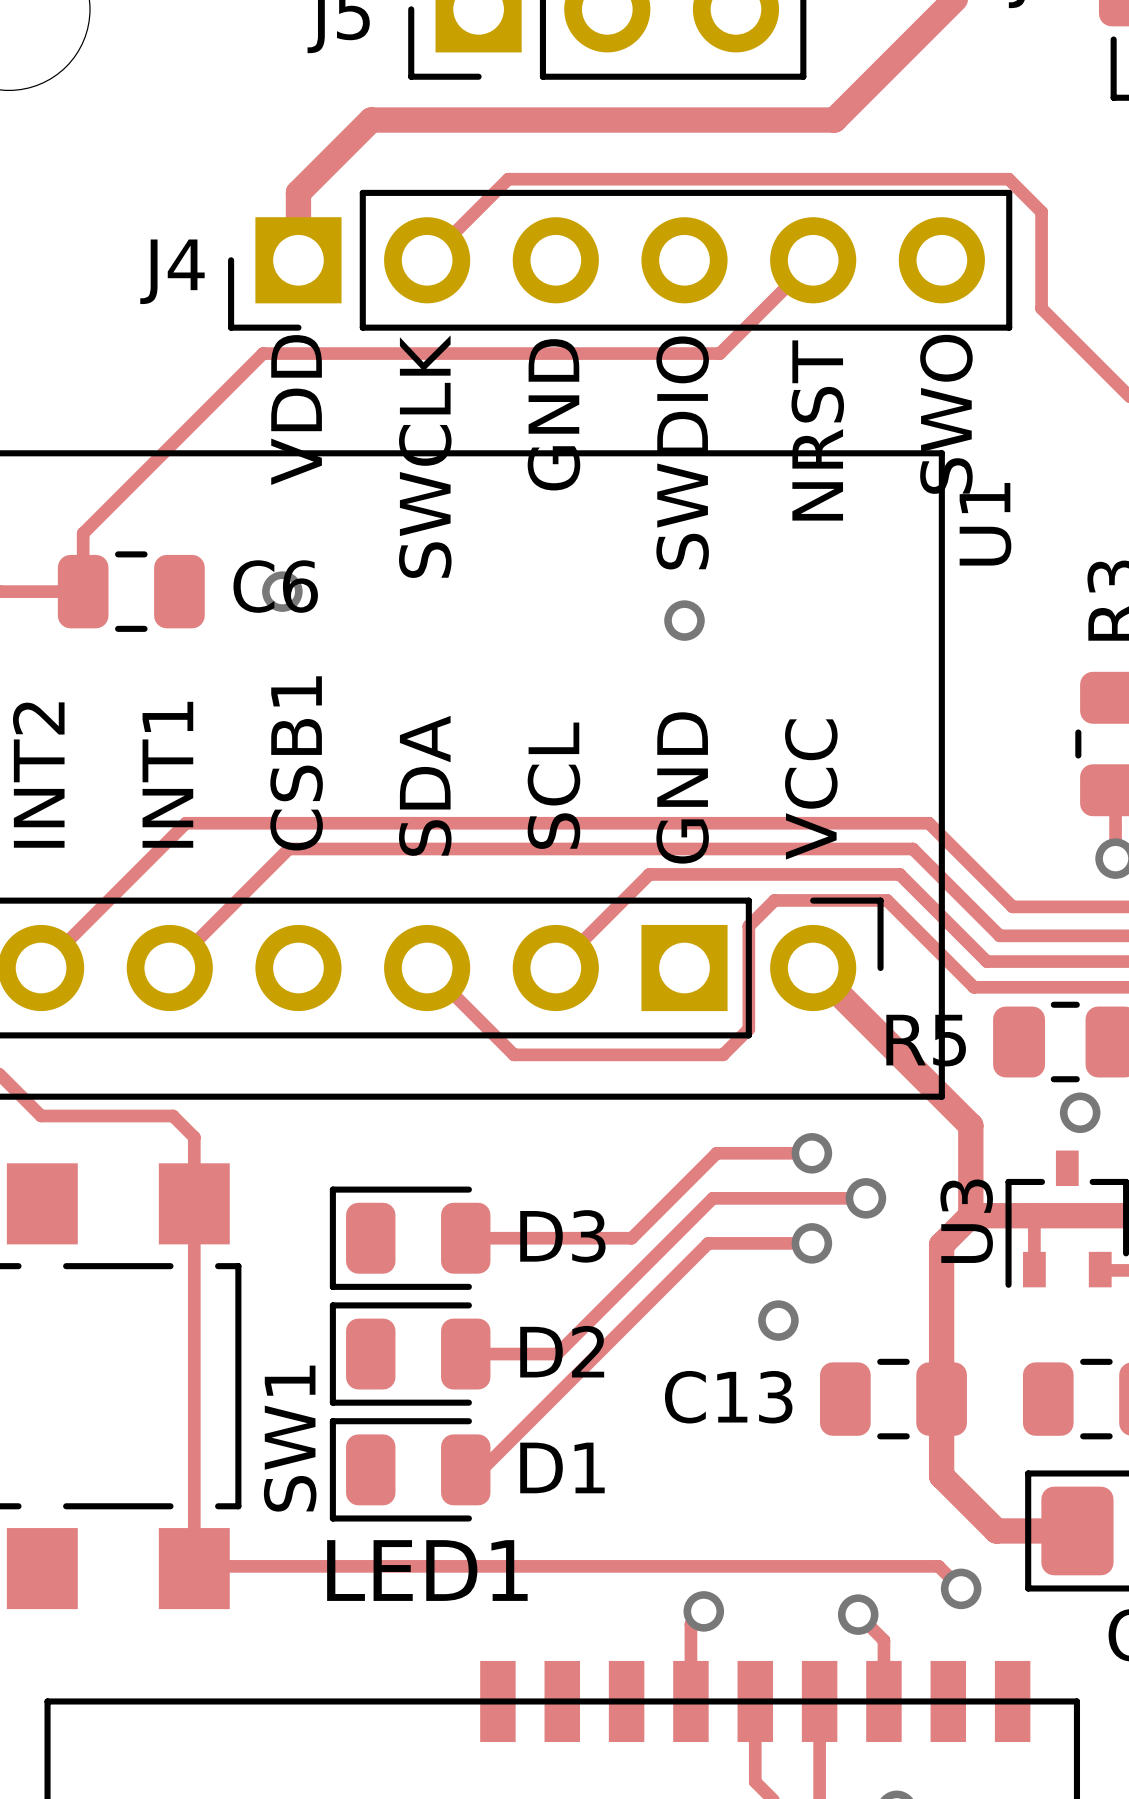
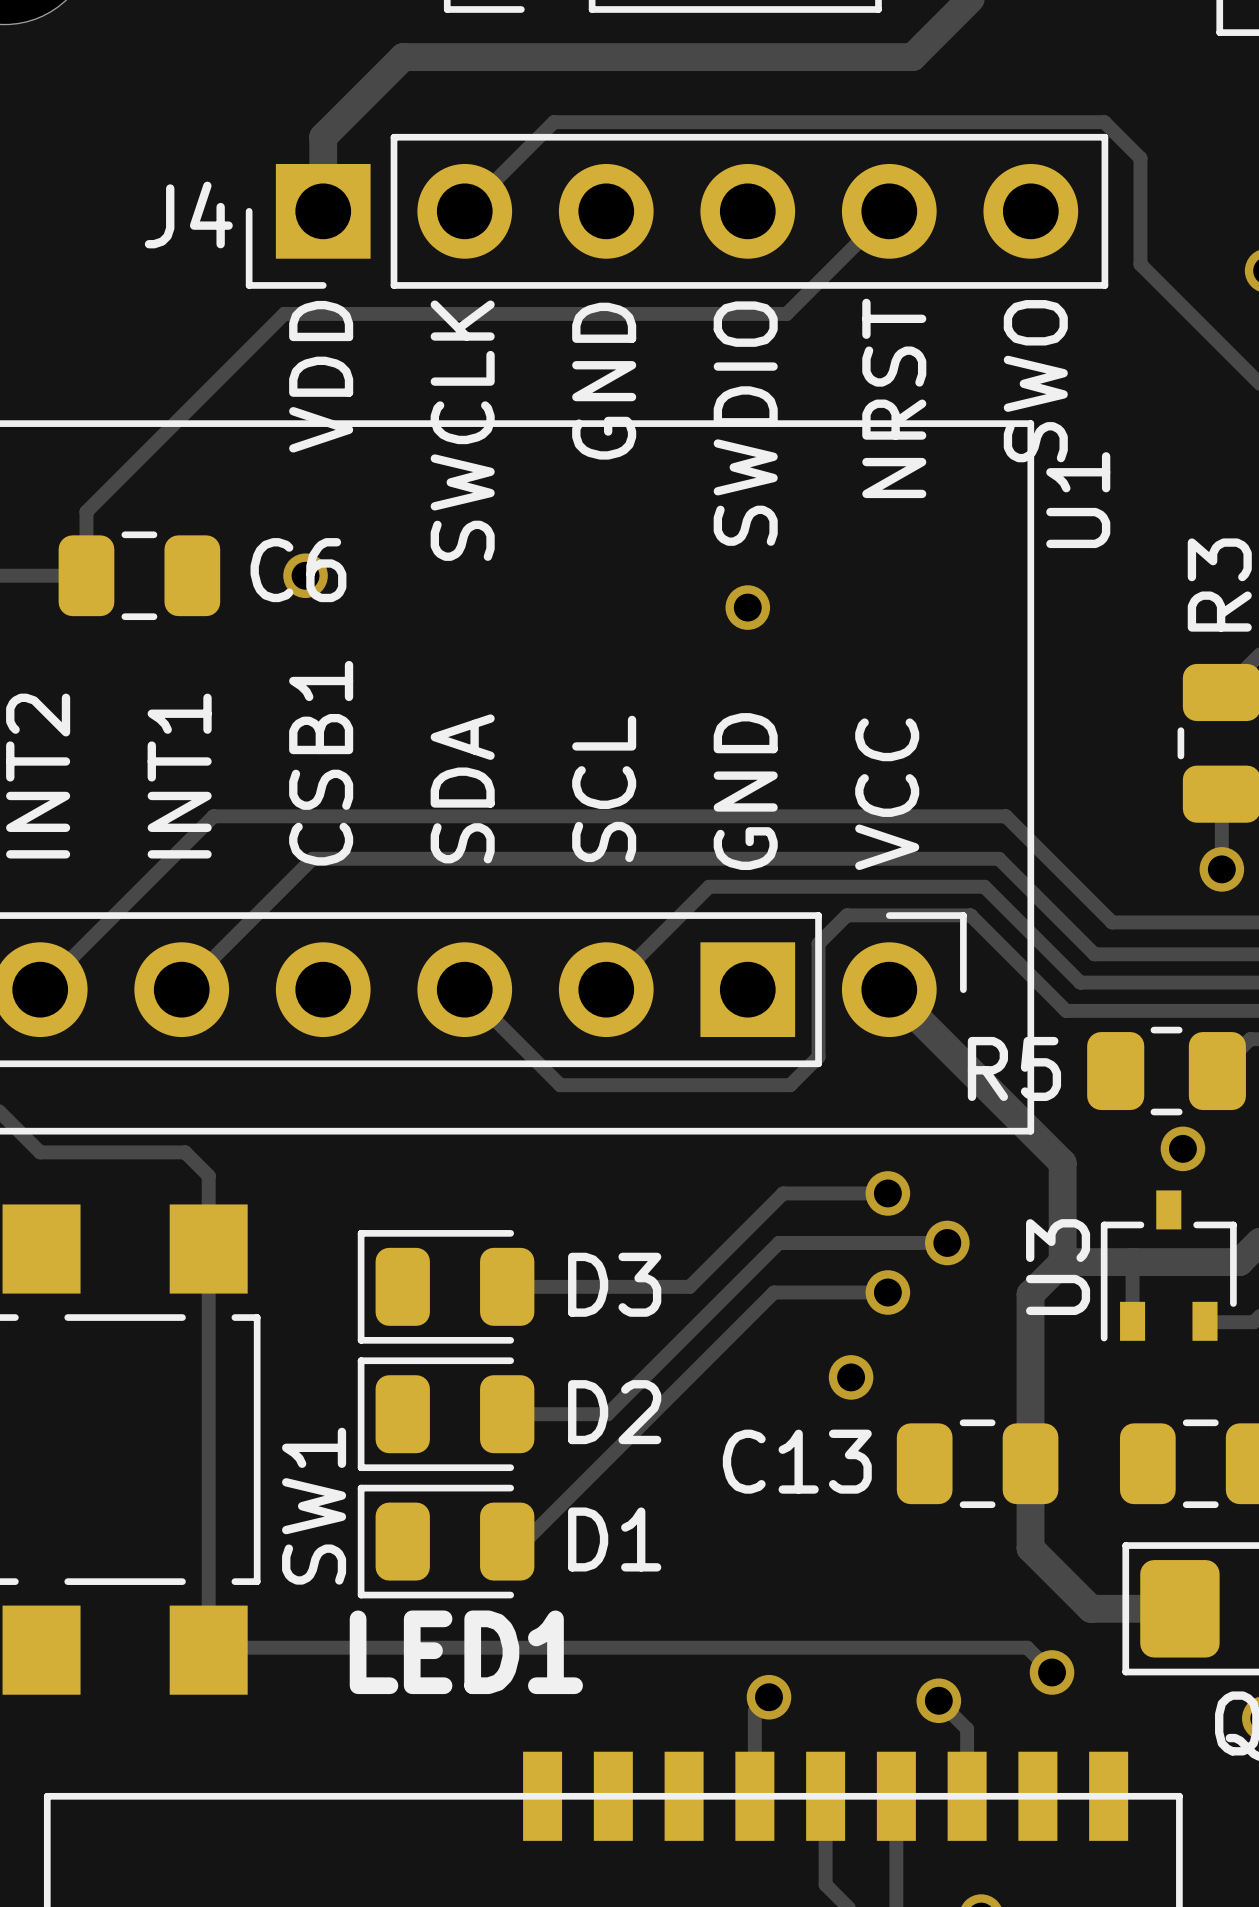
track: (185, 823) (928, 823) (1012, 906) (1015, 906) -> (199, 830) (213, 816) (1006, 816) (1112, 922)

